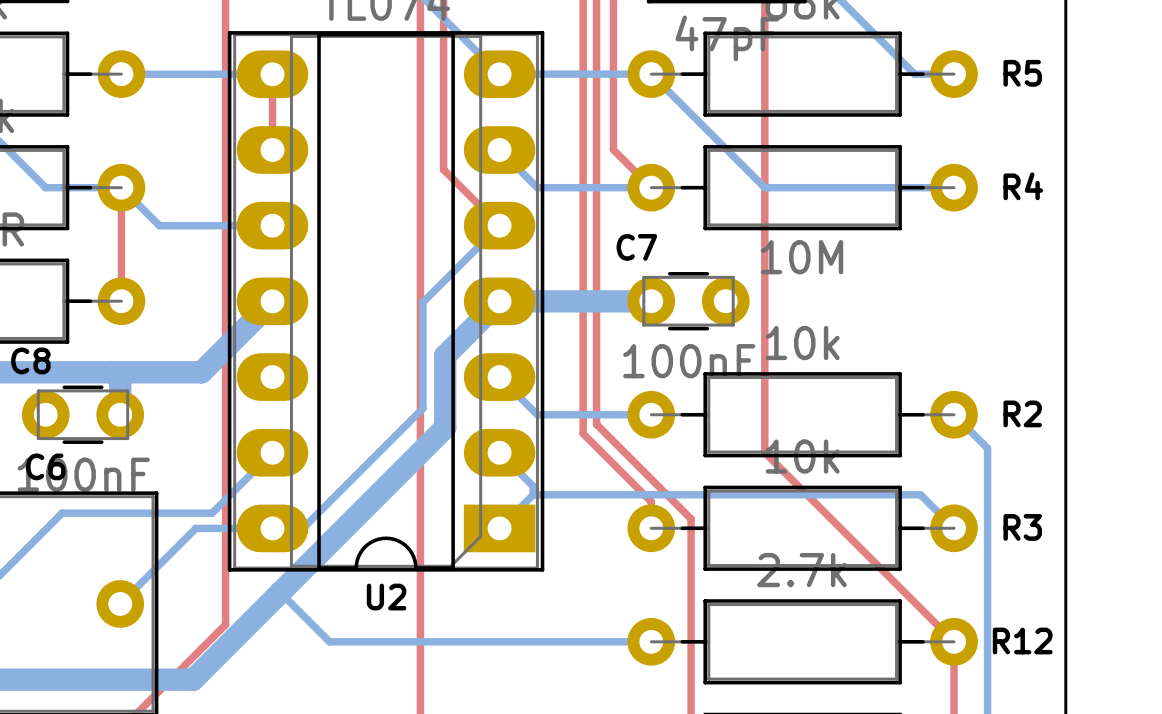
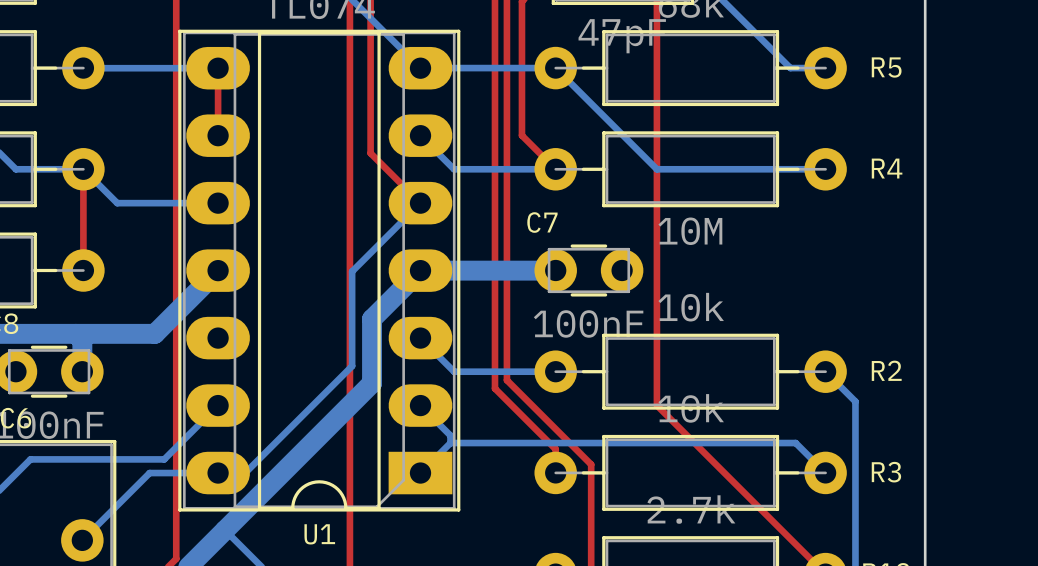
U2 name: U2 (386, 597) -> U1 (319, 534)

